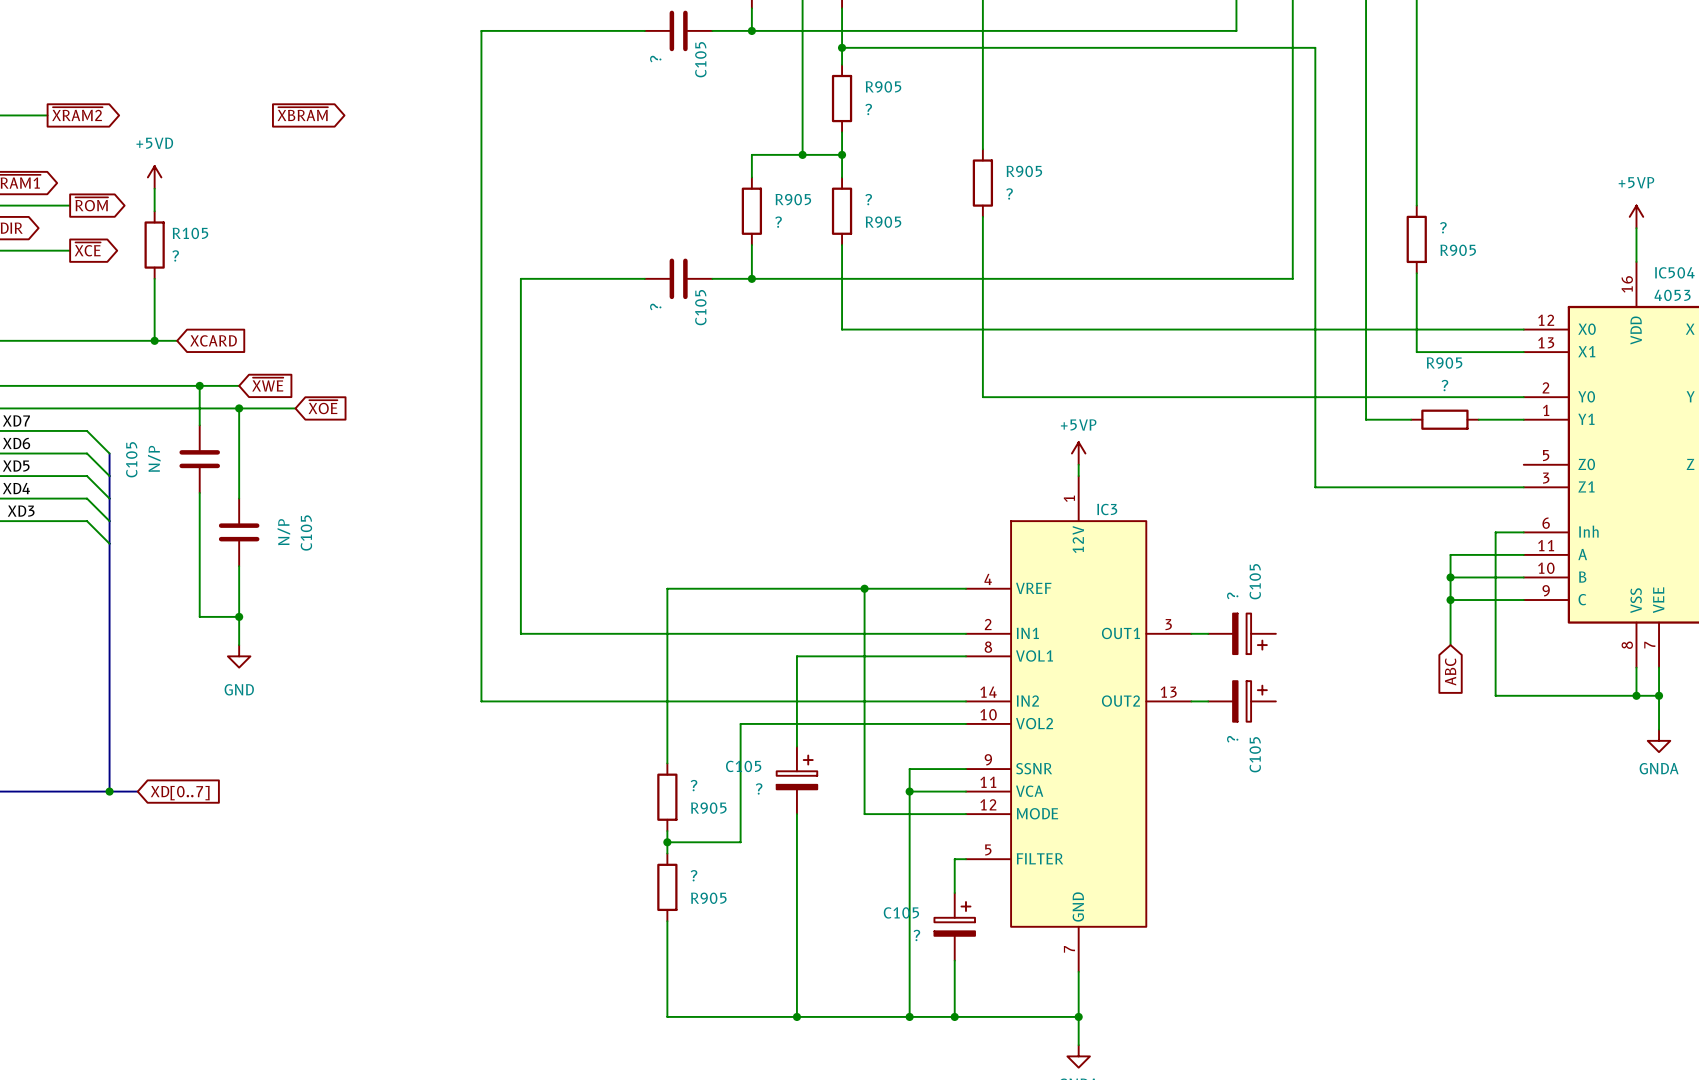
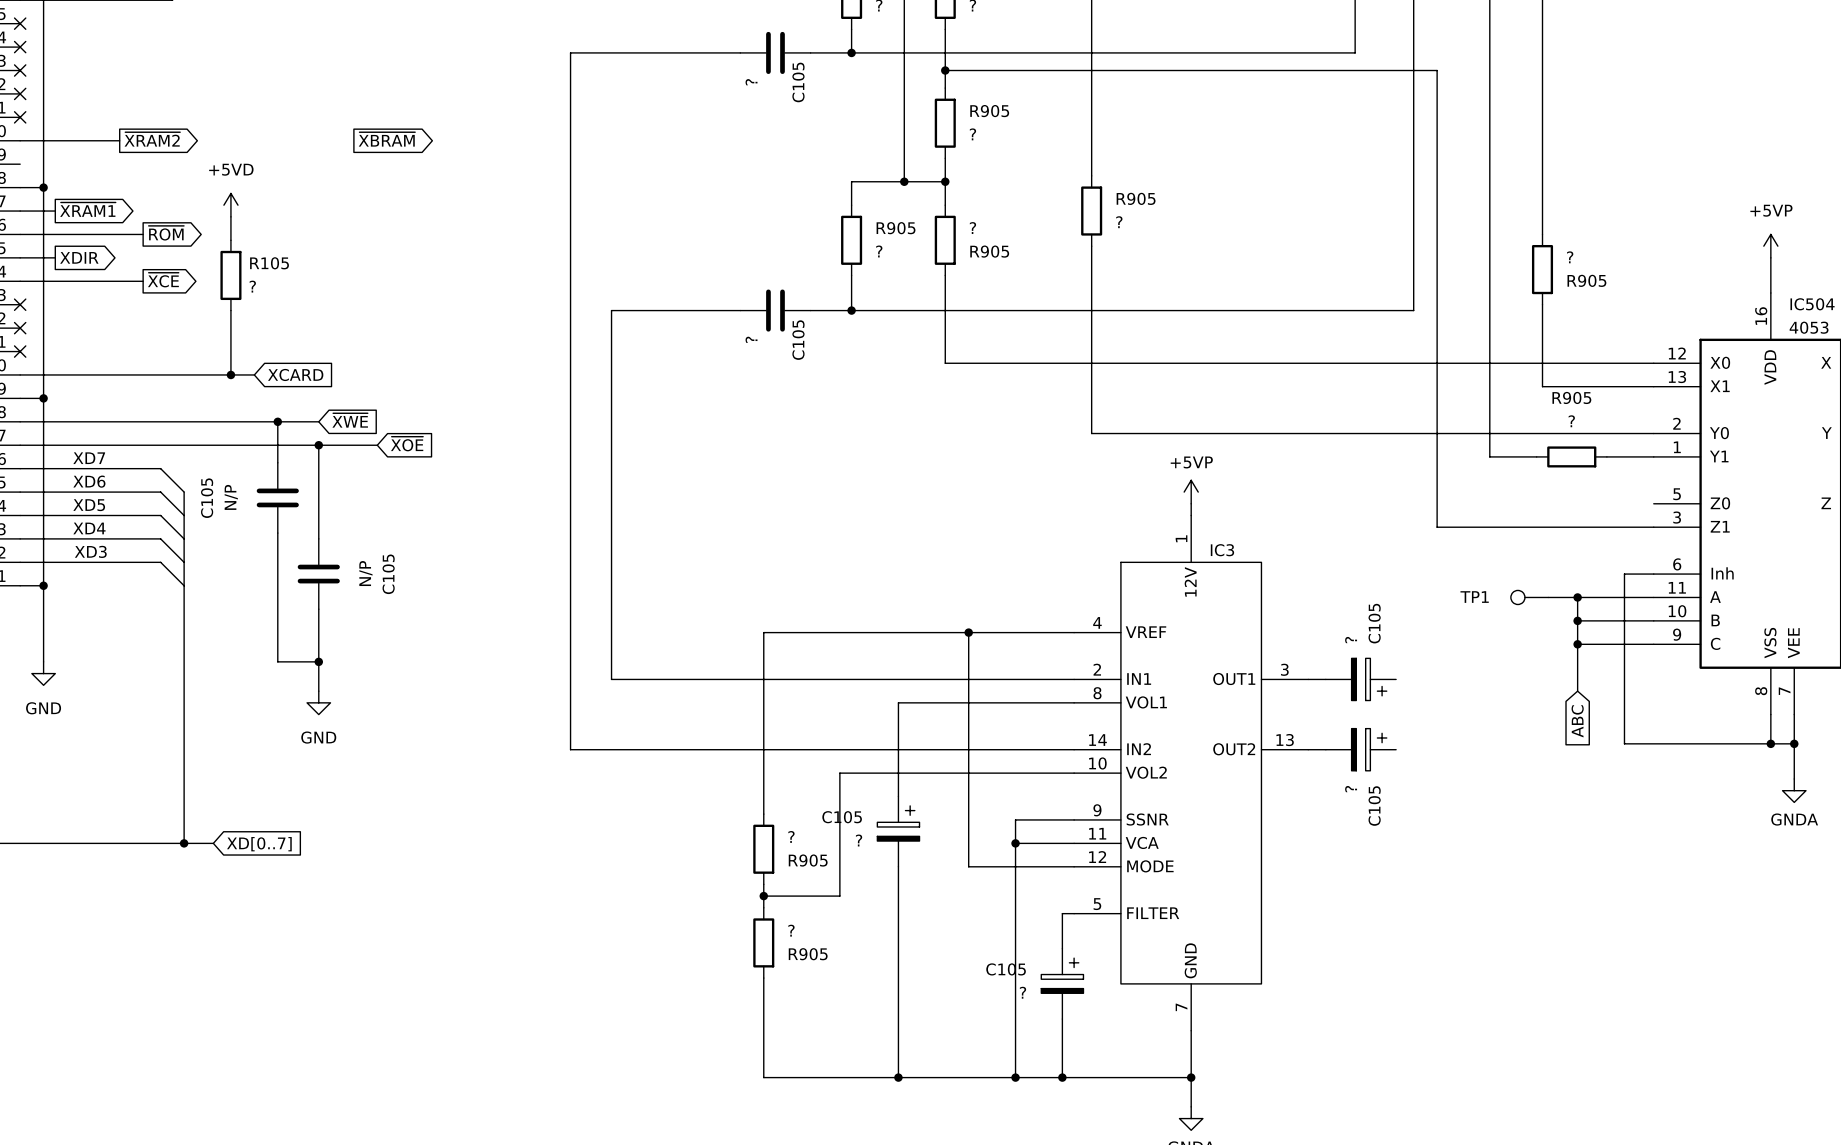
TP1: none -> (1529, 597)
wire: none -> (1548, 597) (1577, 597)
junction: none -> (1577, 597)

